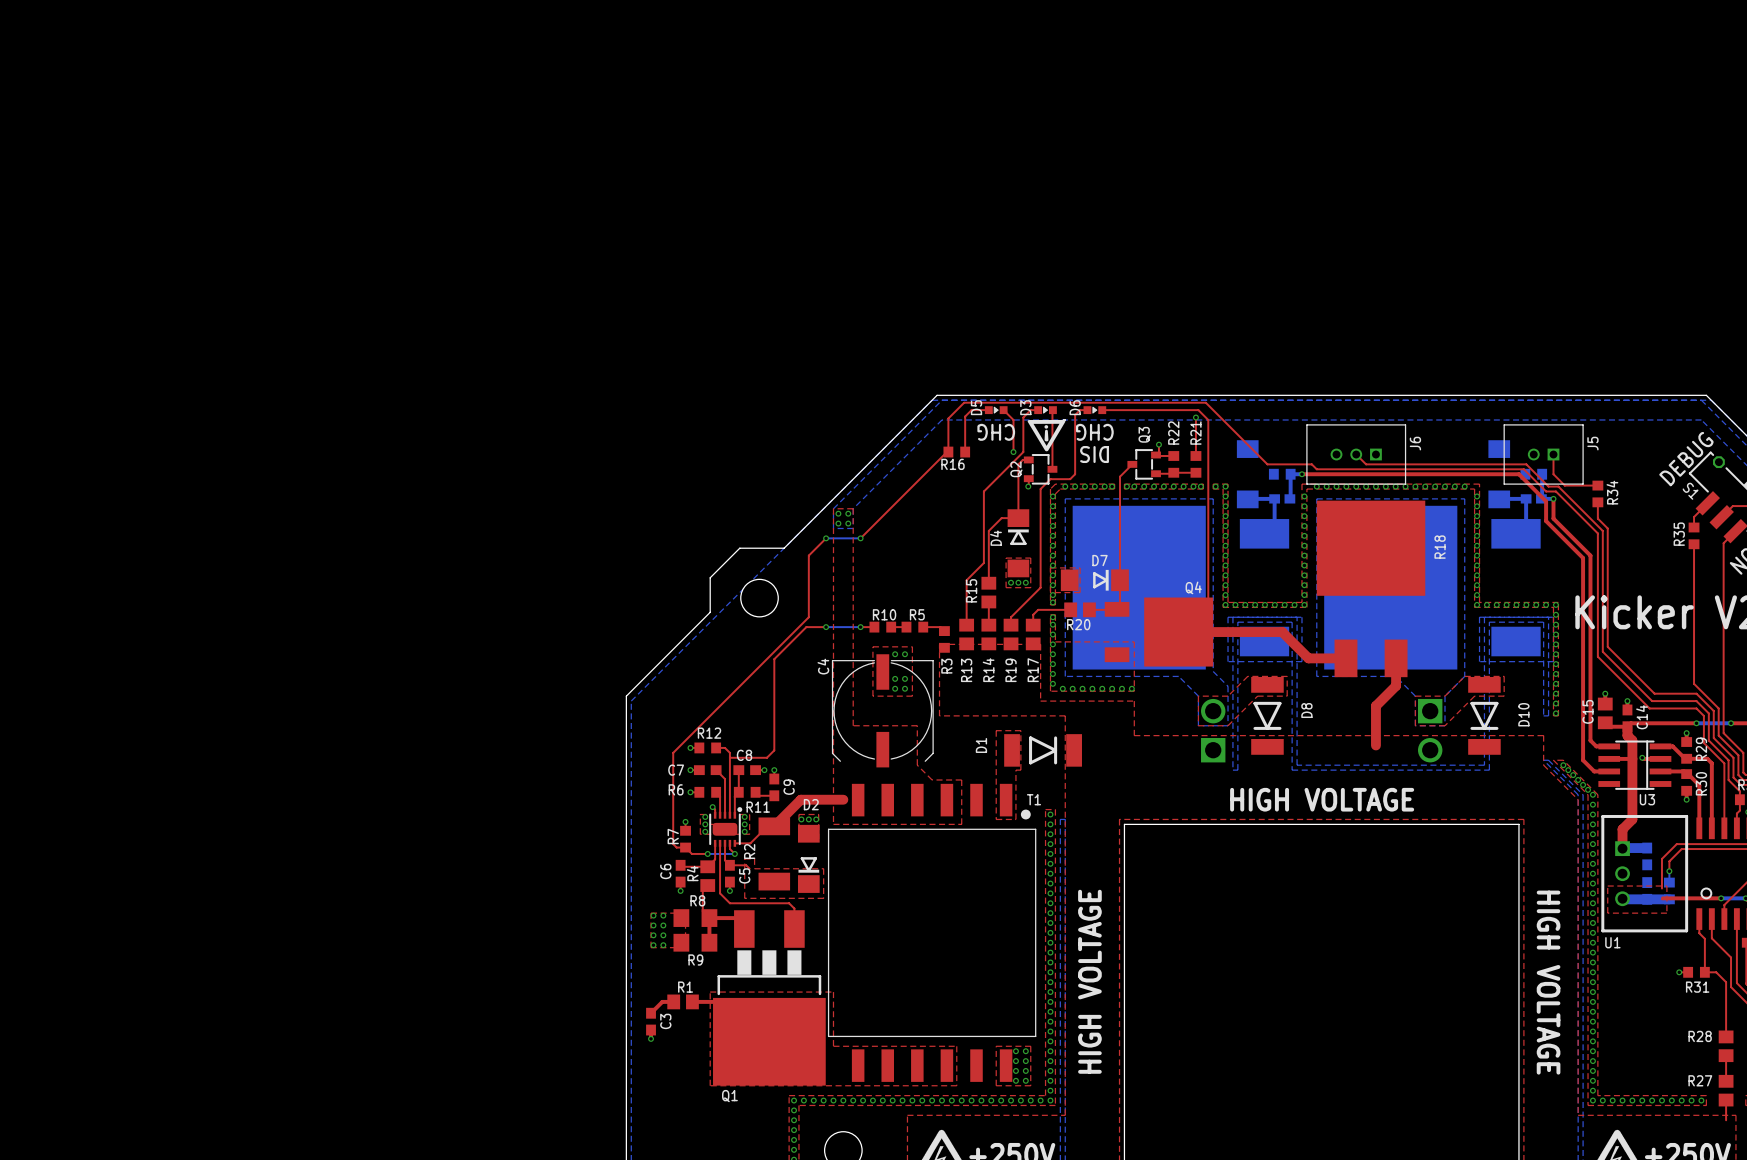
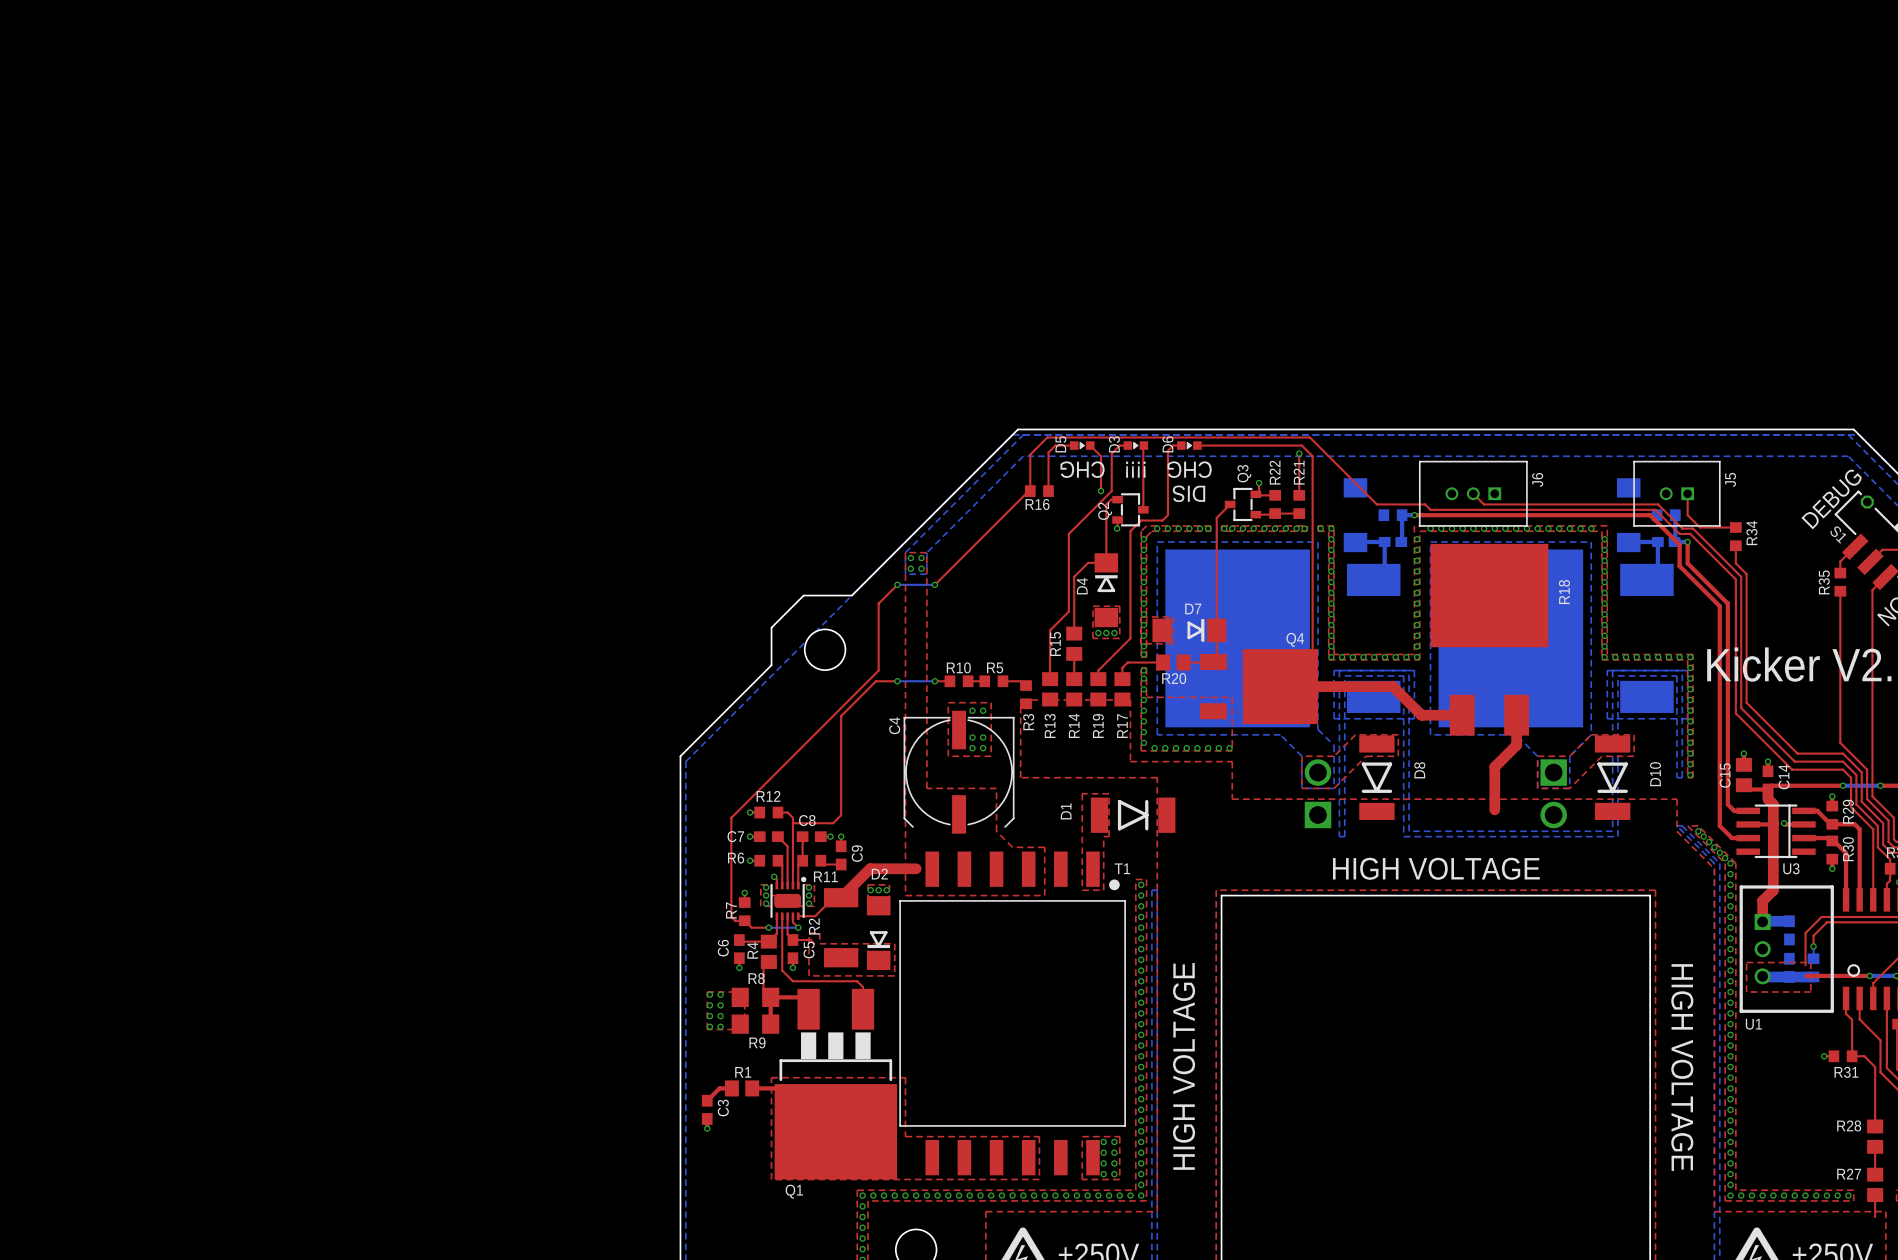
drawing: [1027, 419, 1066, 452] -> none
text: none -> !!!! (1135, 469)

